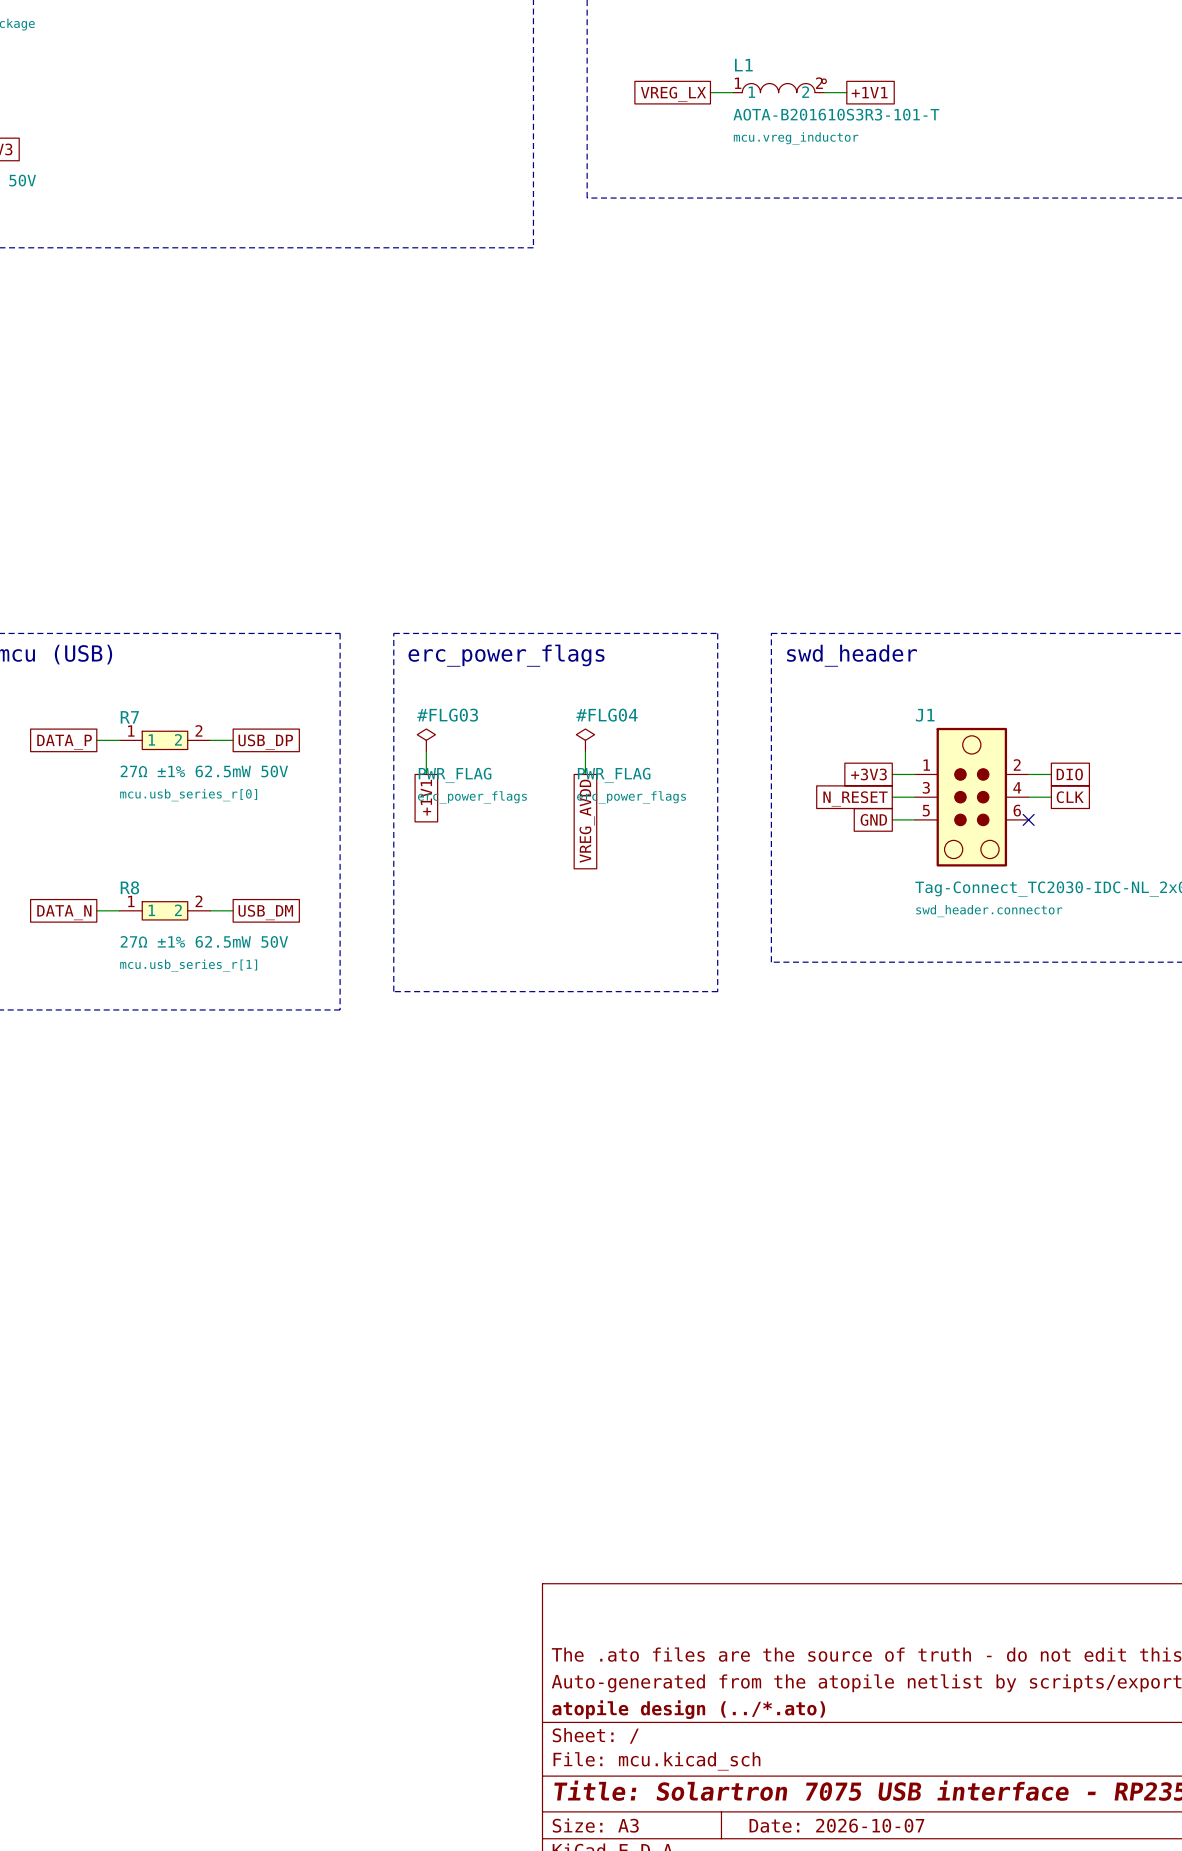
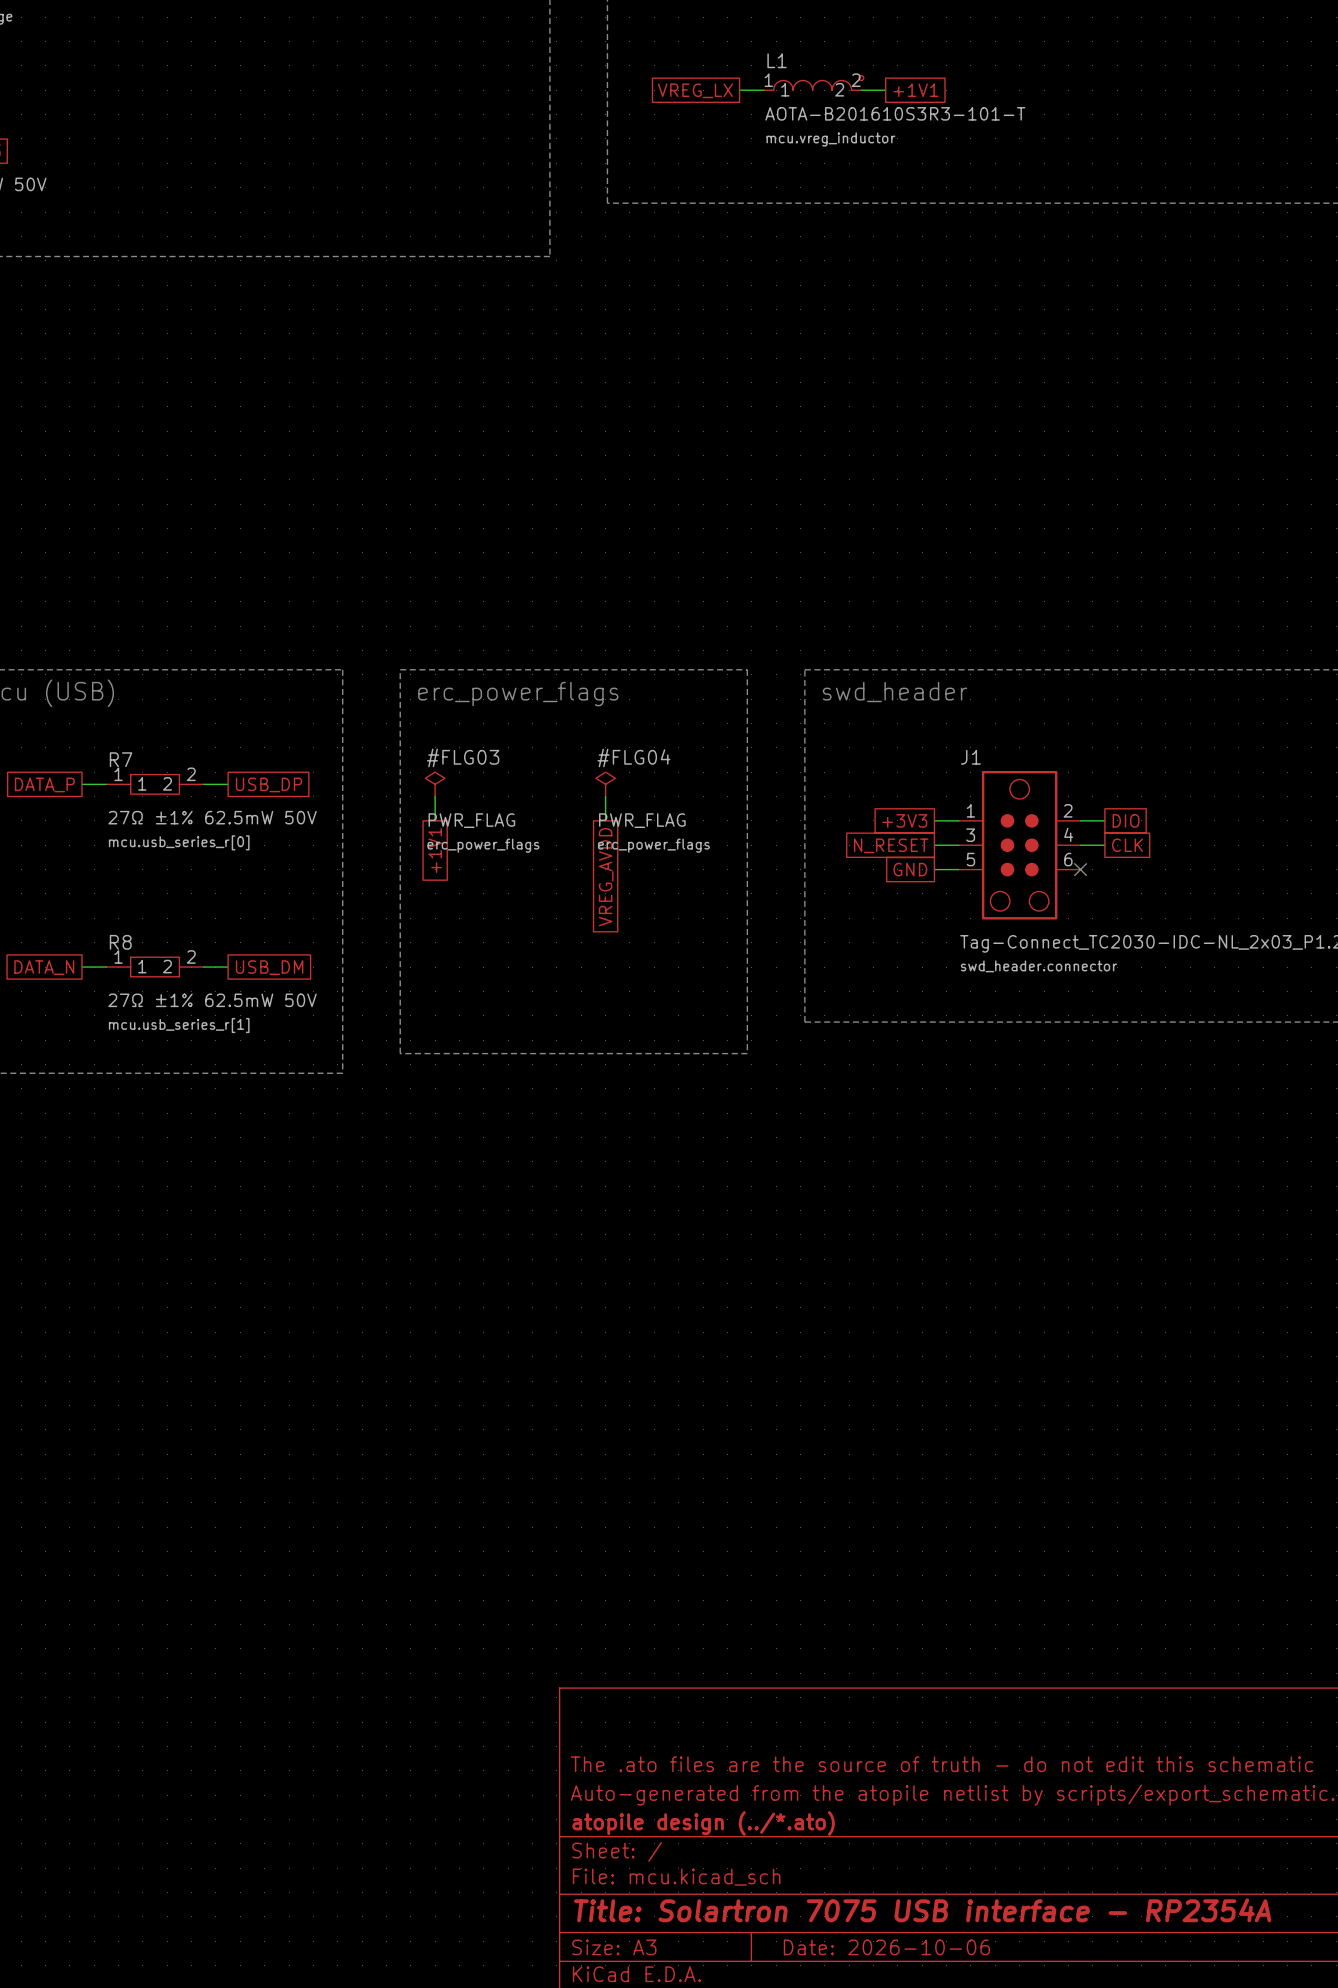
title block: Date: 2026-10-07 (836, 1825) -> Date: 2026-10-06 (886, 1947)

